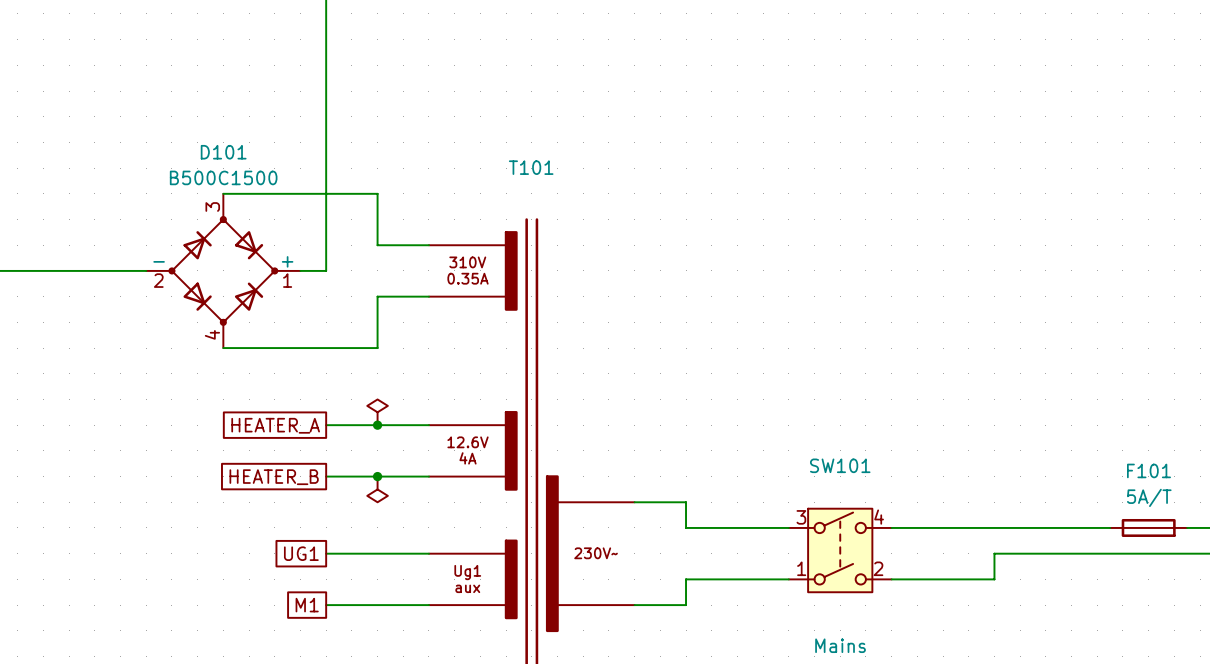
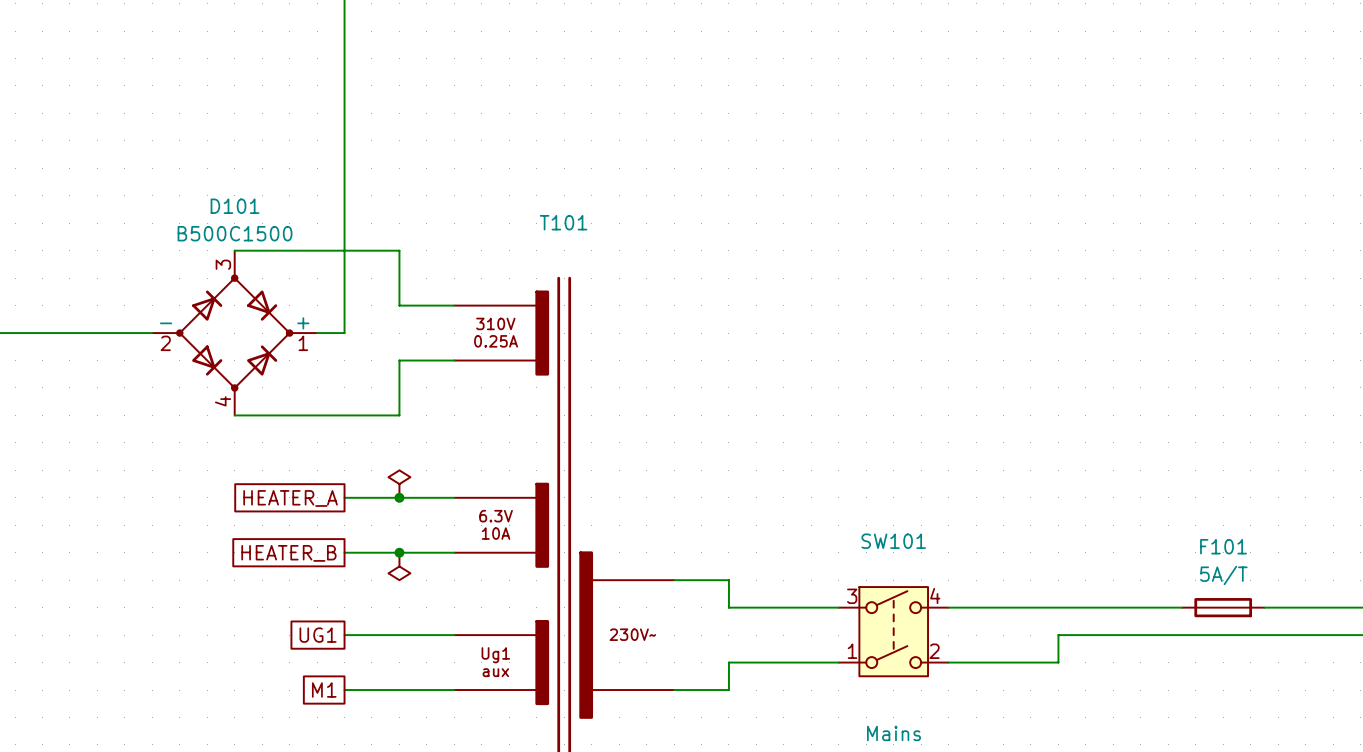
T101 text: 0.35A (468, 278) -> 0.25A (496, 341)
T101 text: 12.6V (468, 442) -> 6.3V (496, 516)
T101 text: 4A (468, 458) -> 10A (496, 533)

